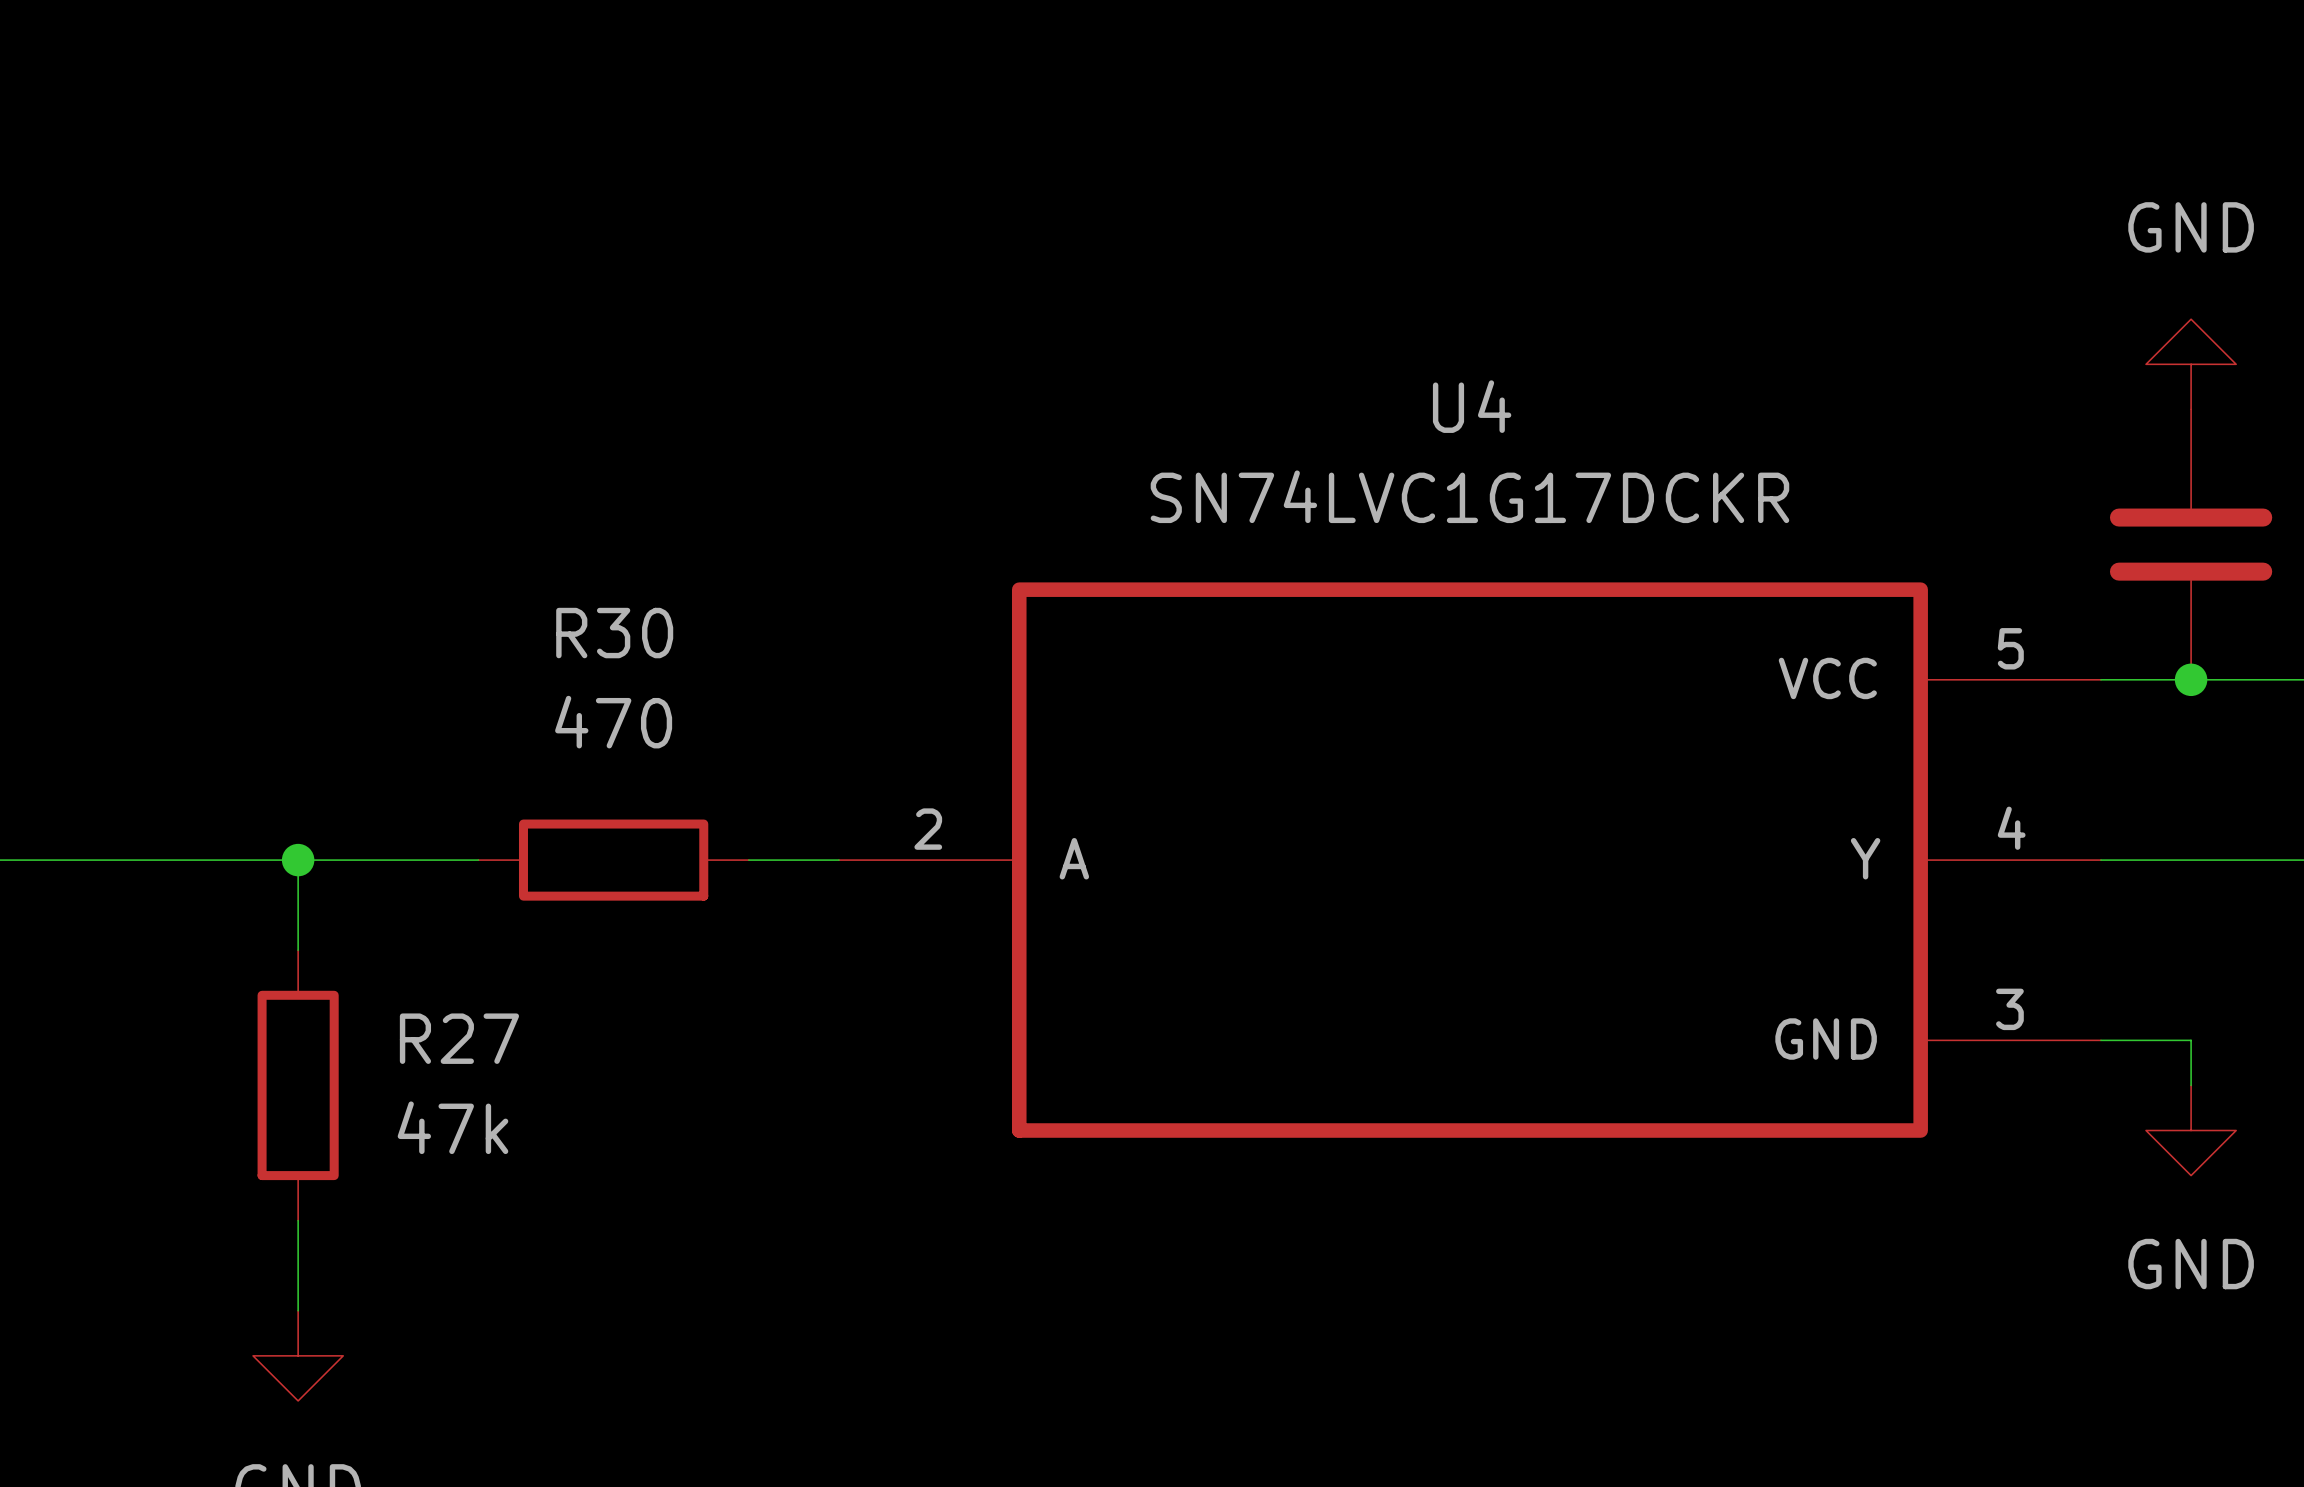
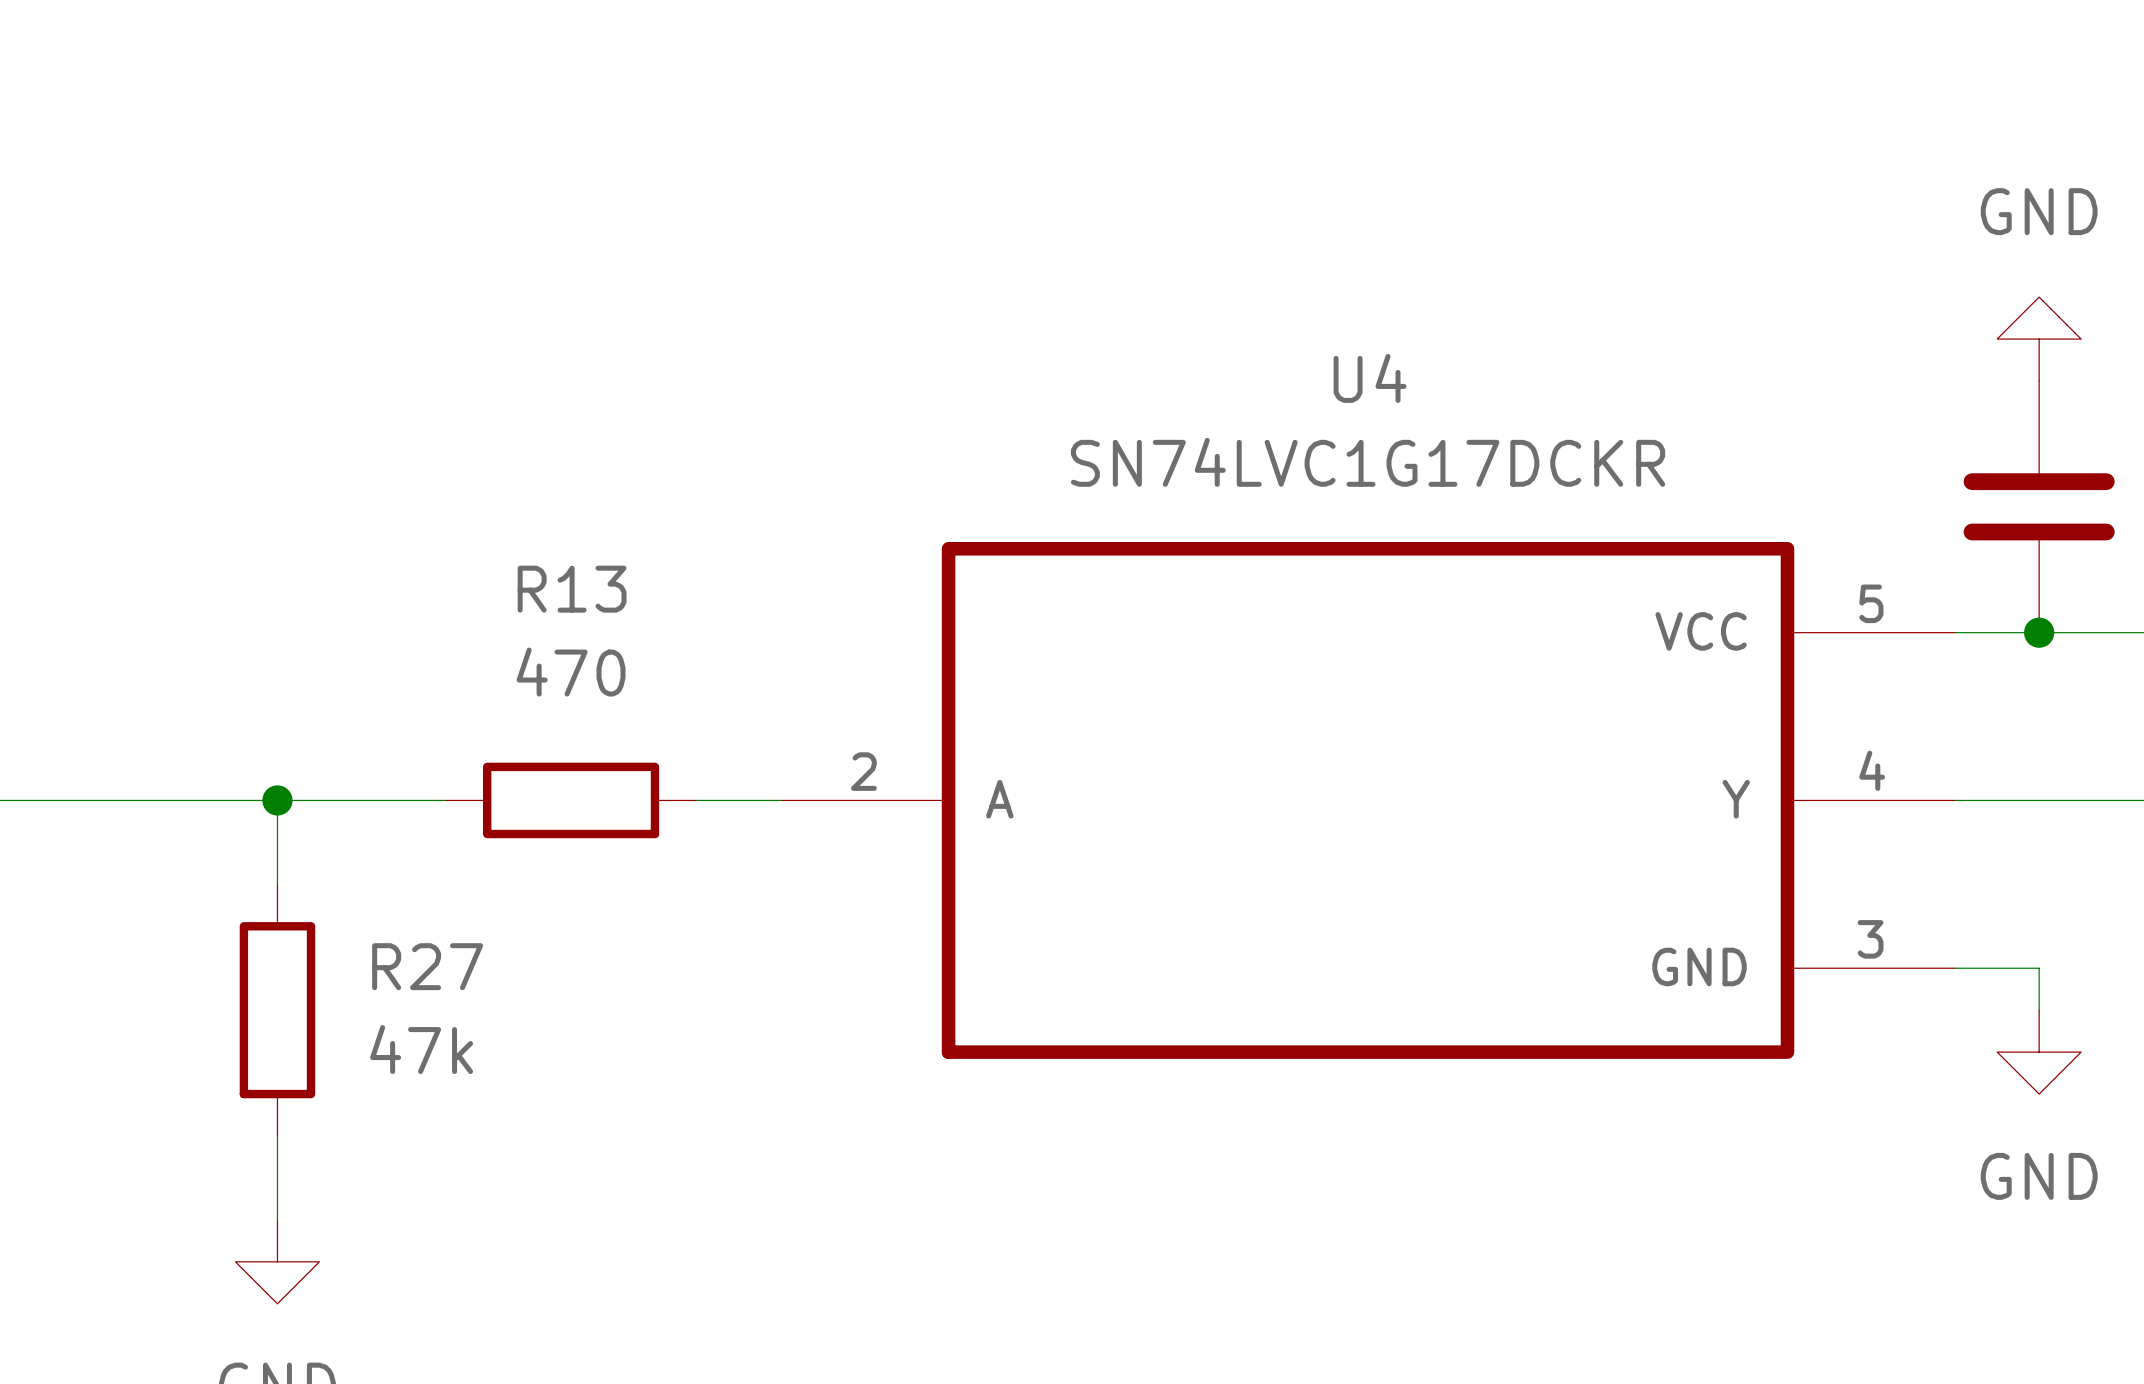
R30 name: R30 (614, 633) -> R13 (572, 589)

